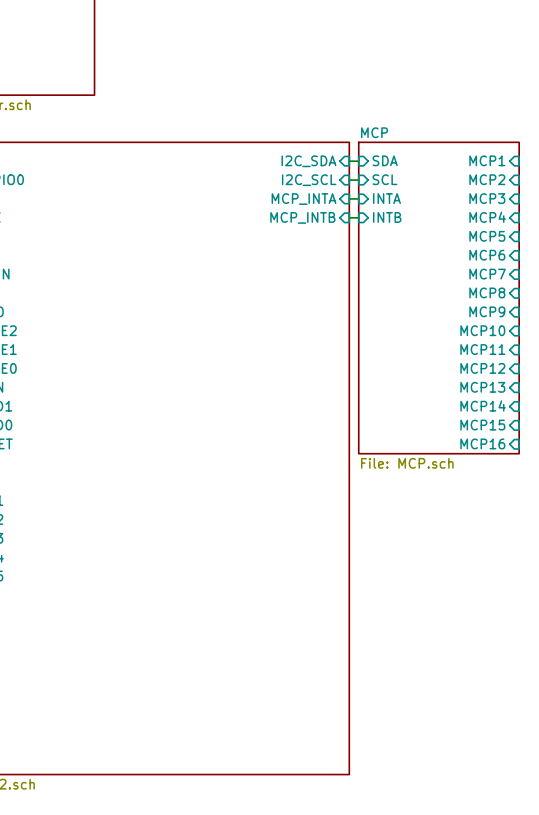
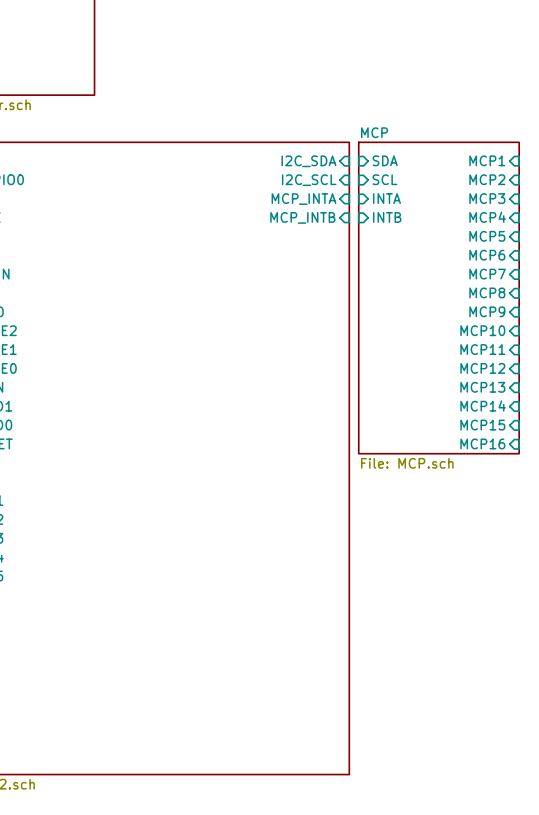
wire: (349, 161) (358, 161) -> none
wire: (349, 180) (358, 180) -> none
wire: (349, 198) (358, 198) -> none
wire: (349, 217) (358, 217) -> none

